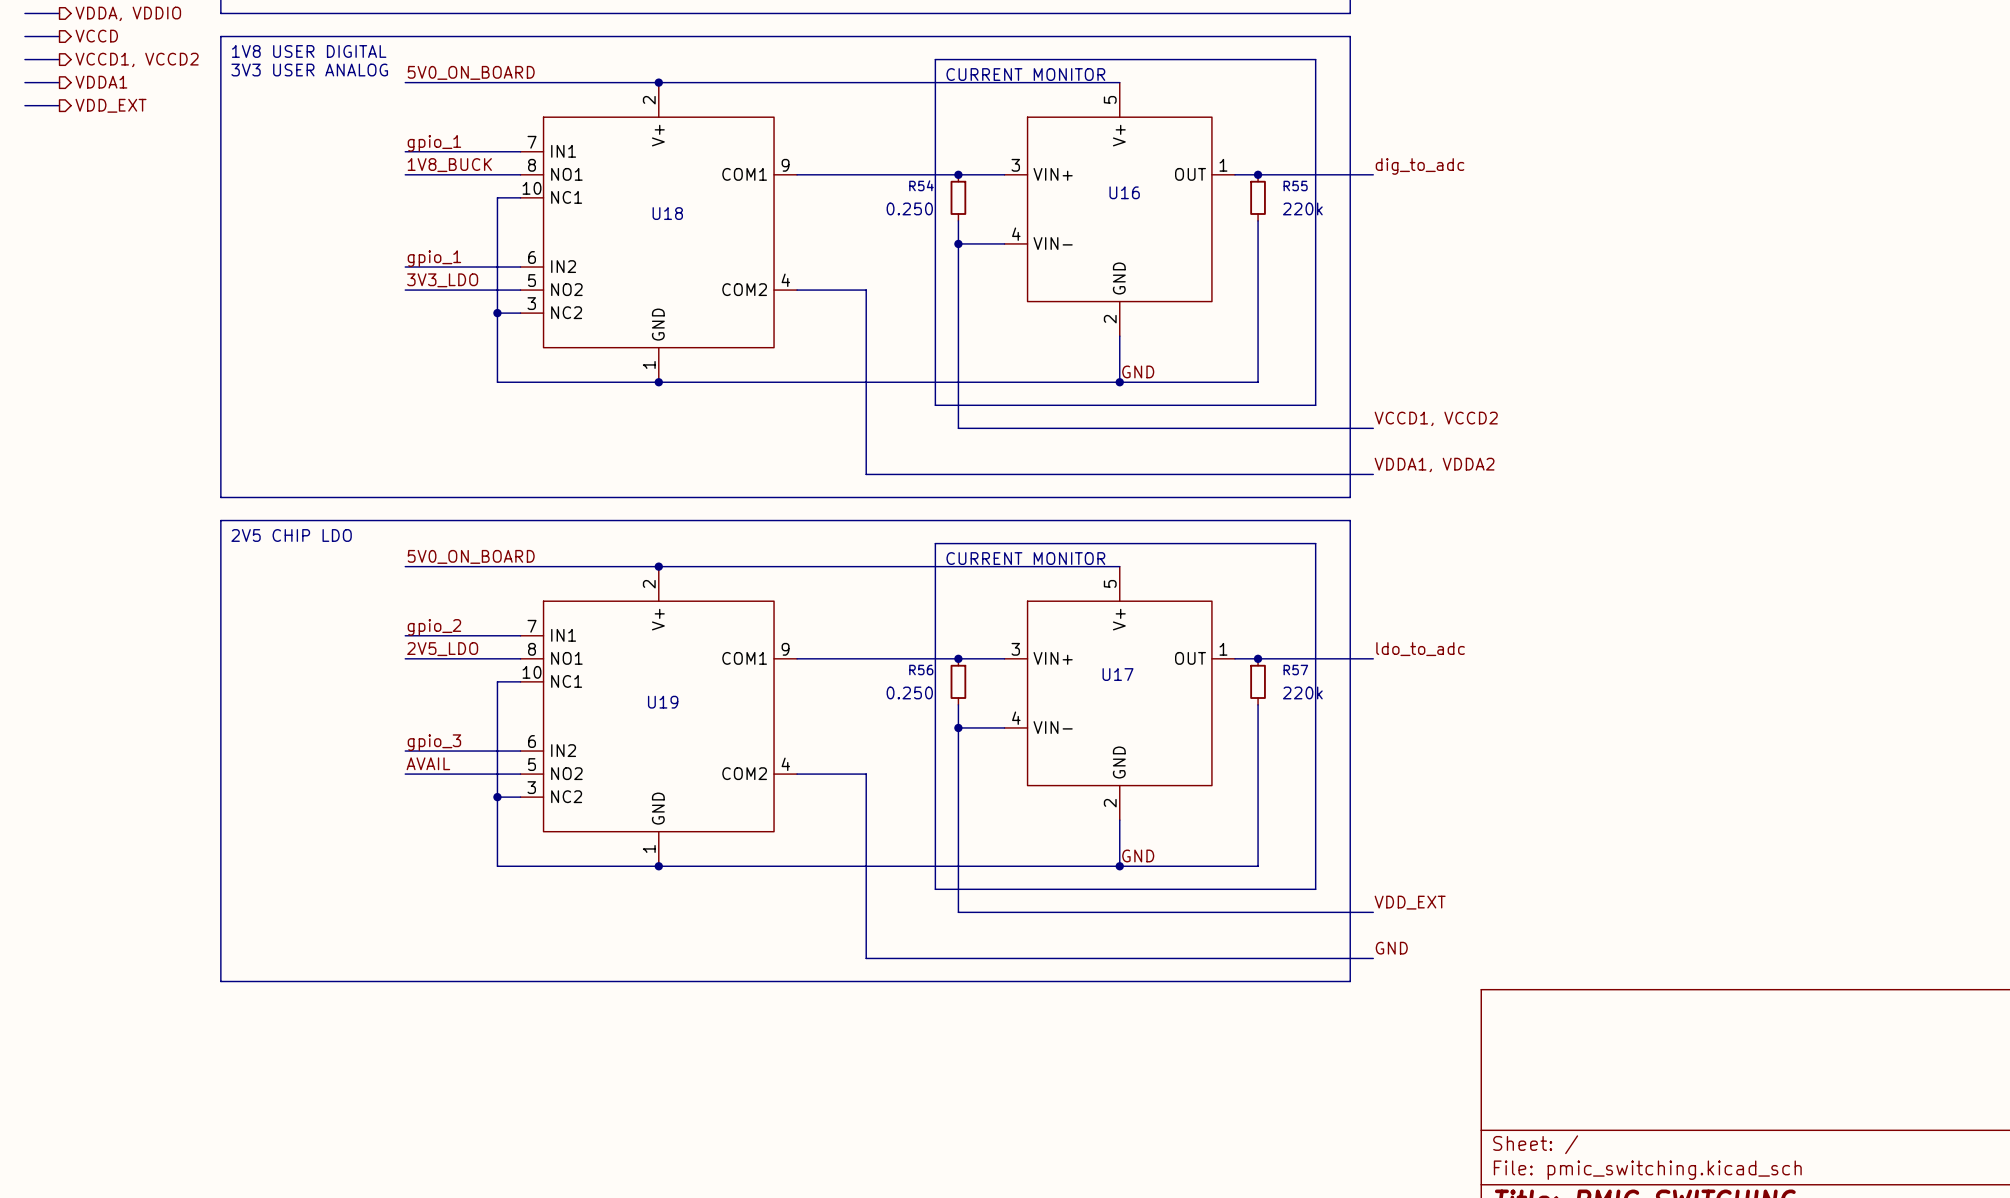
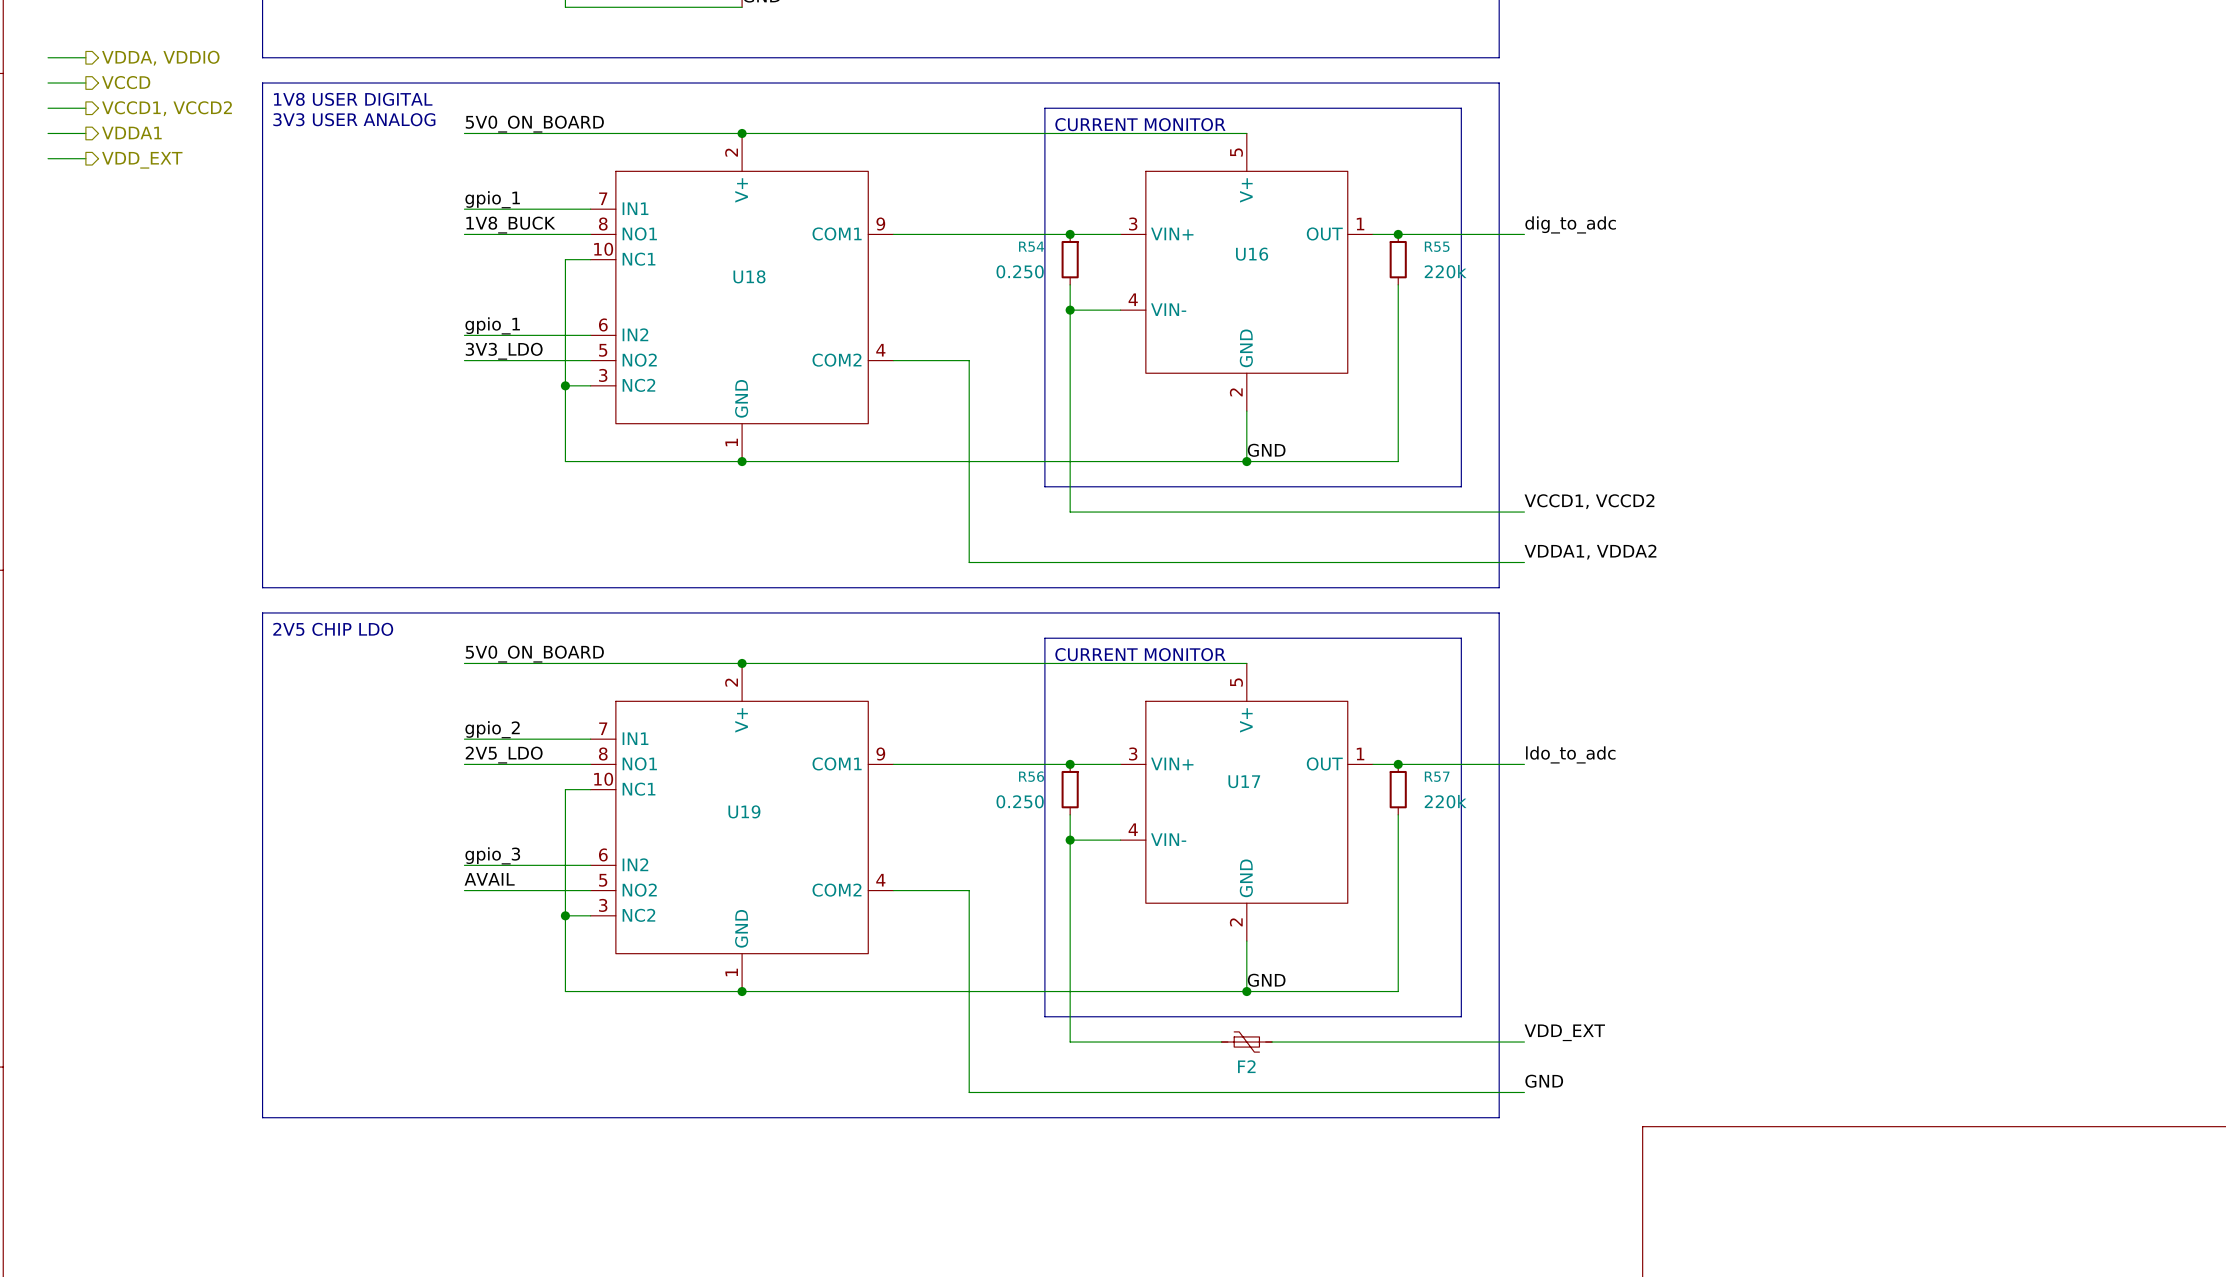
F2: none -> (1246, 1042)

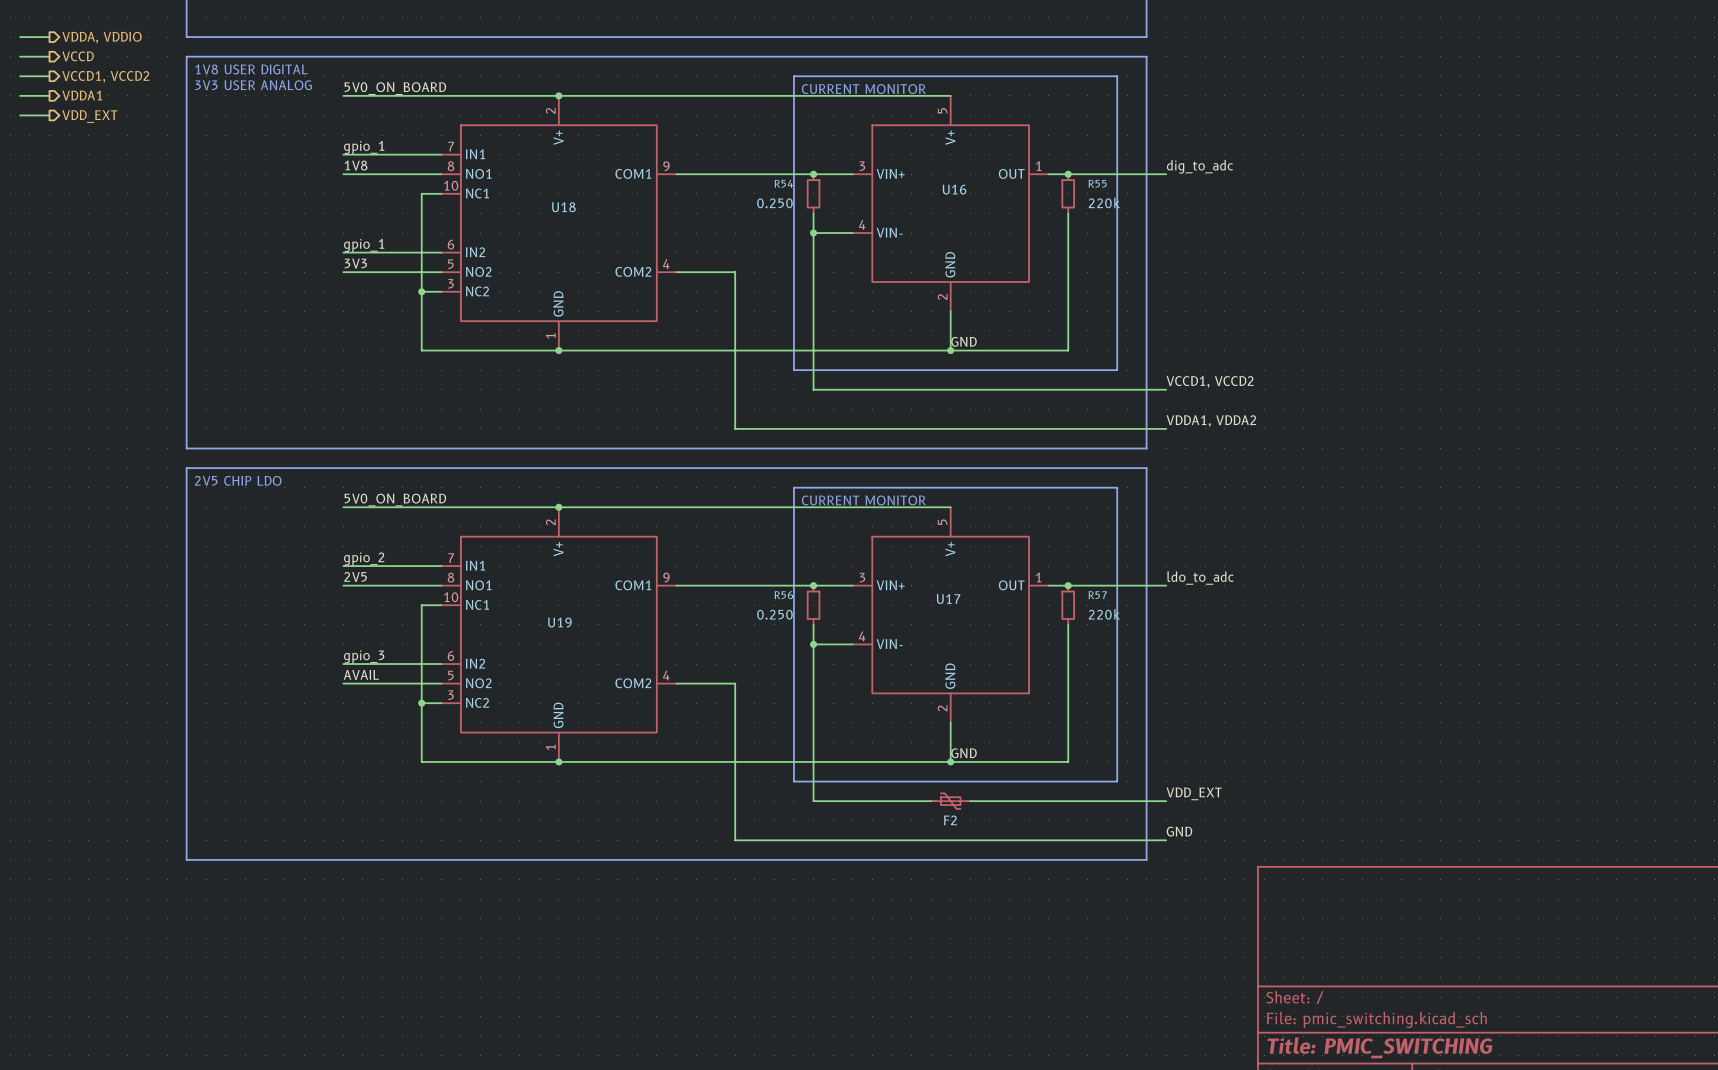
label: 1V8_BUCK (510, 225) -> 1V8 (356, 165)
label: 3V3_LDO (504, 351) -> 3V3 (355, 263)
label: 2V5_LDO (504, 755) -> 2V5 (355, 576)

